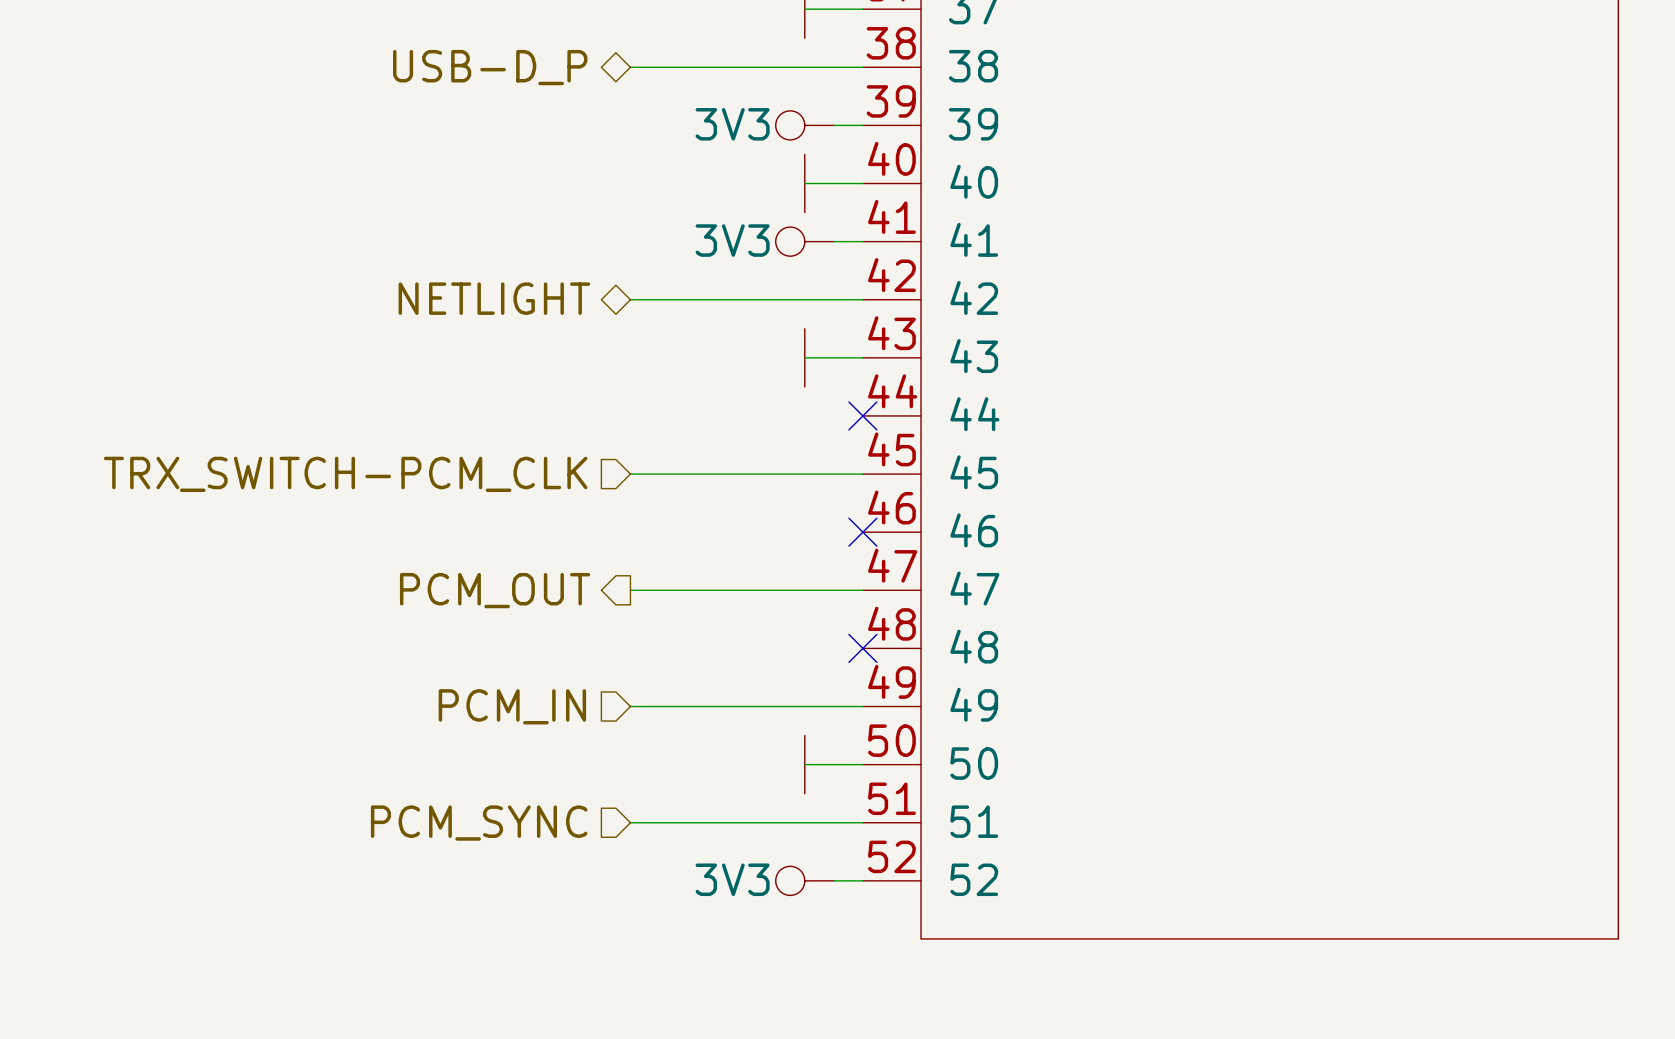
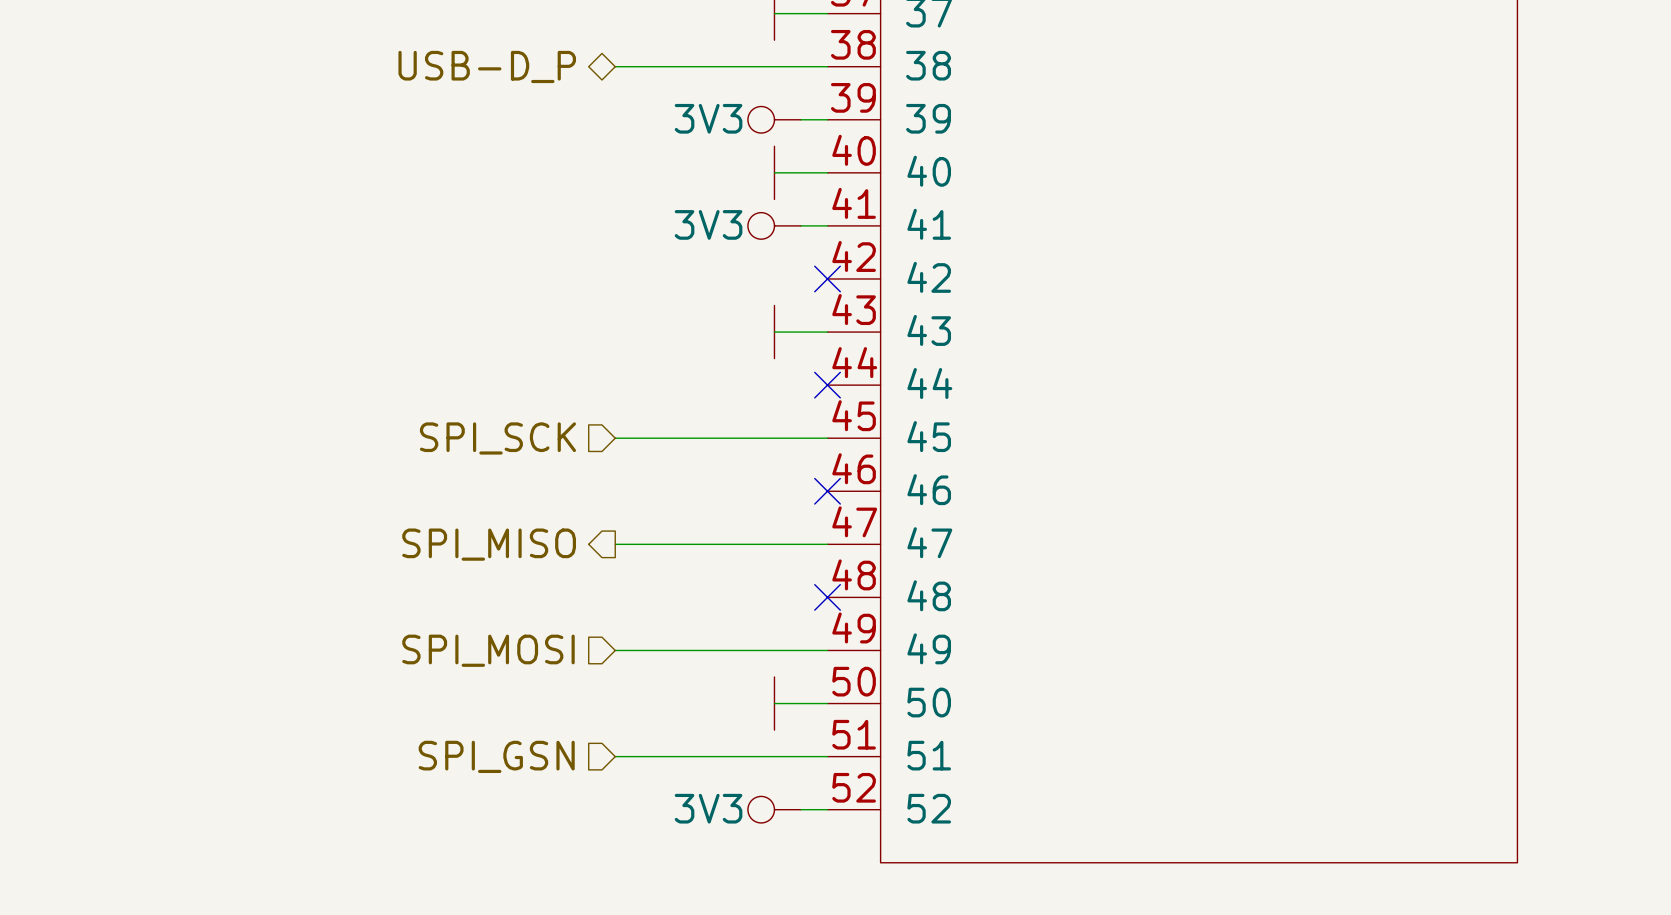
hierarchical label: NETLIGHT (494, 298) -> none
wire: (630, 299) (862, 299) -> none
no-connect mark: none -> (827, 278)
hierarchical label: TRX_SWITCH-PCM_CLK (345, 474) -> SPI_SCK (497, 438)
hierarchical label: PCM_OUT (495, 590) -> SPI_MISO (489, 544)
hierarchical label: PCM_IN (512, 706) -> SPI_MOSI (488, 650)
hierarchical label: PCM_SYNC (479, 823) -> SPI_GSN (496, 756)

